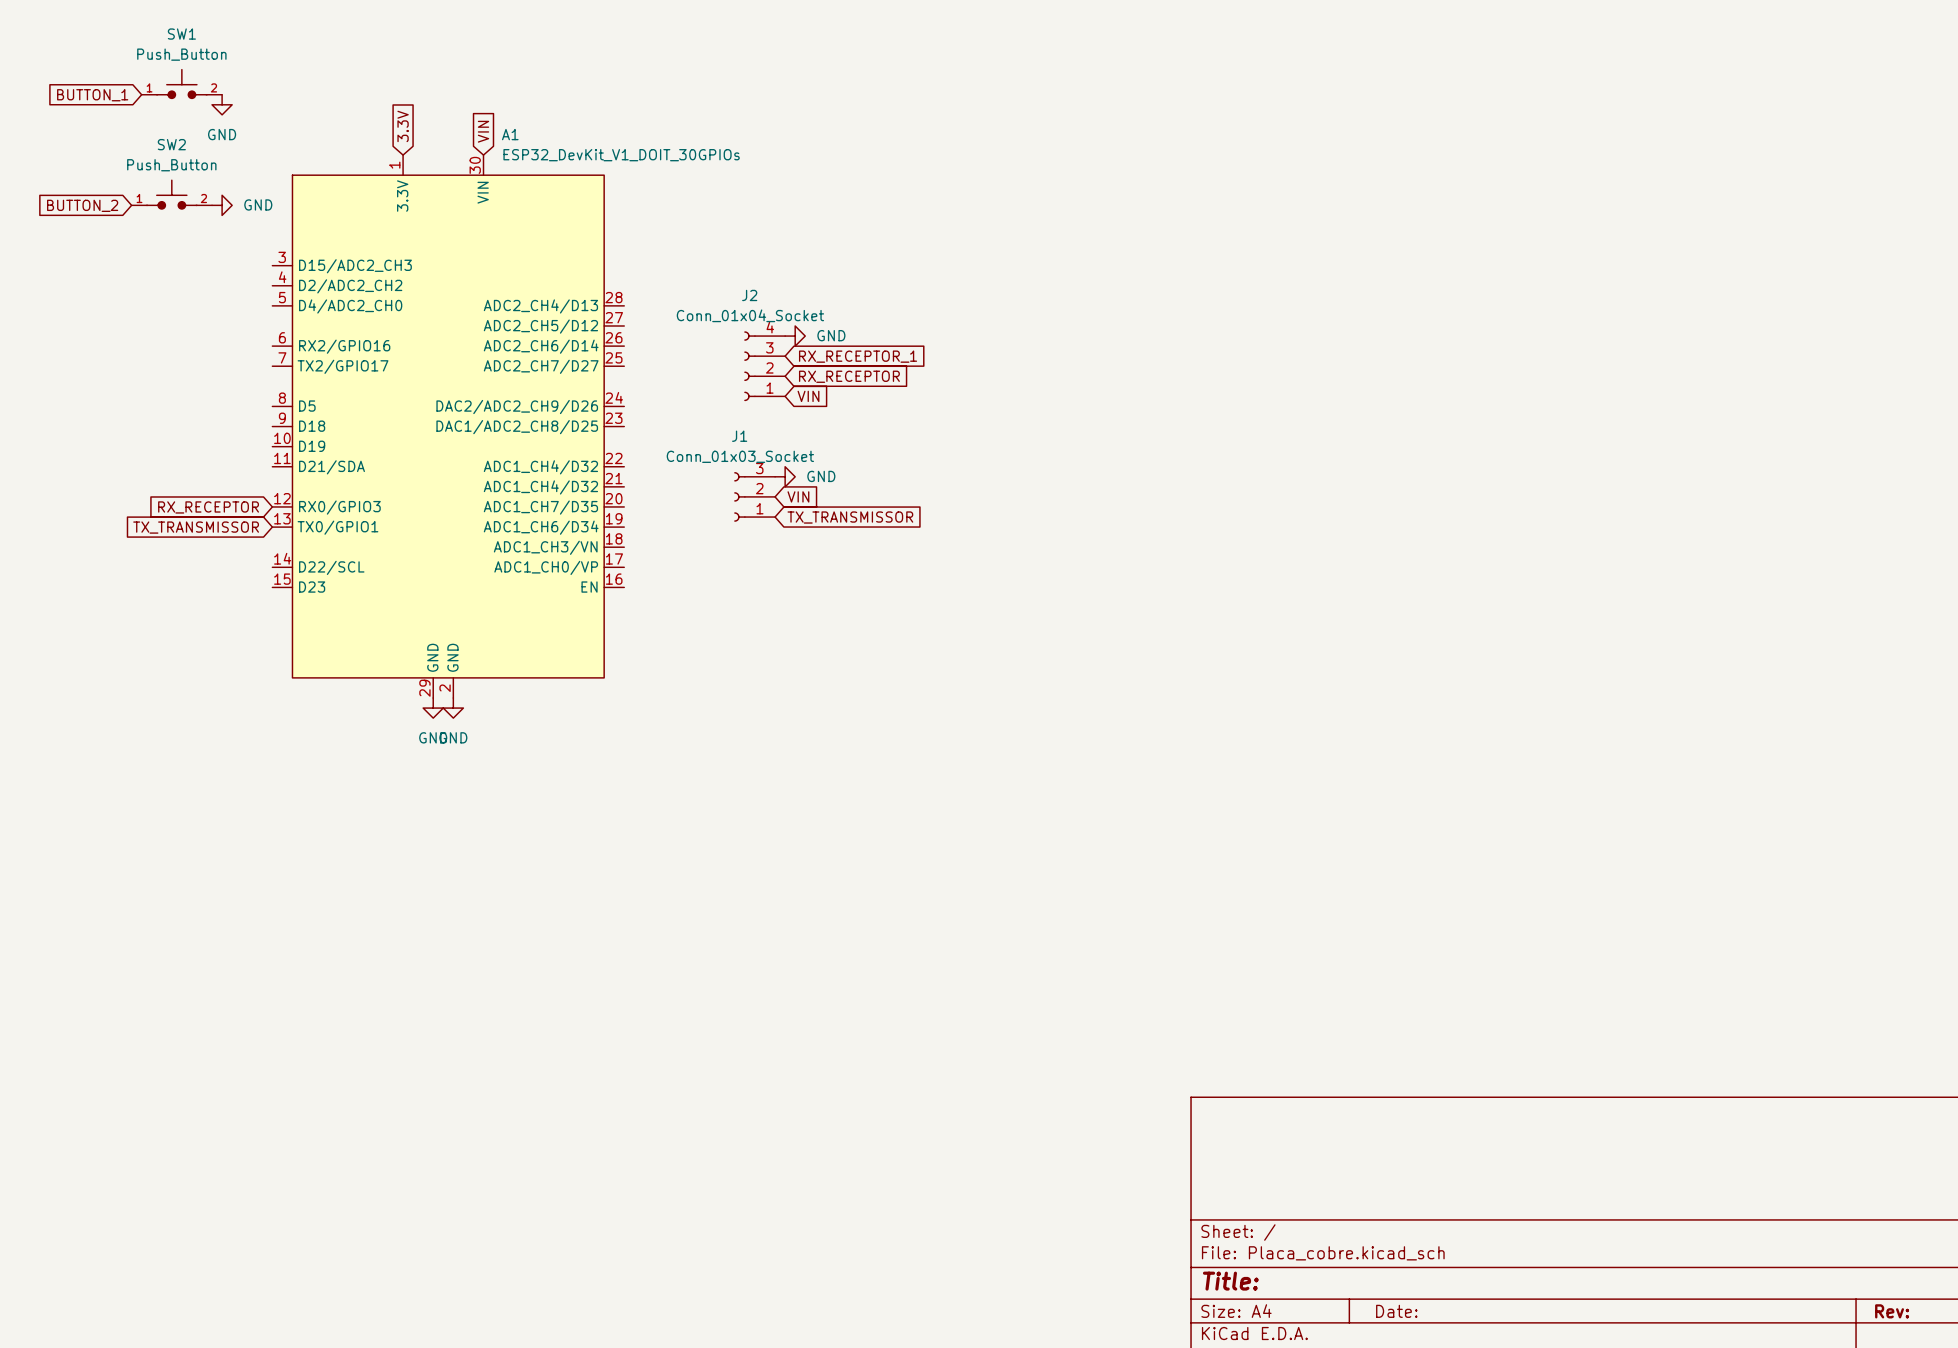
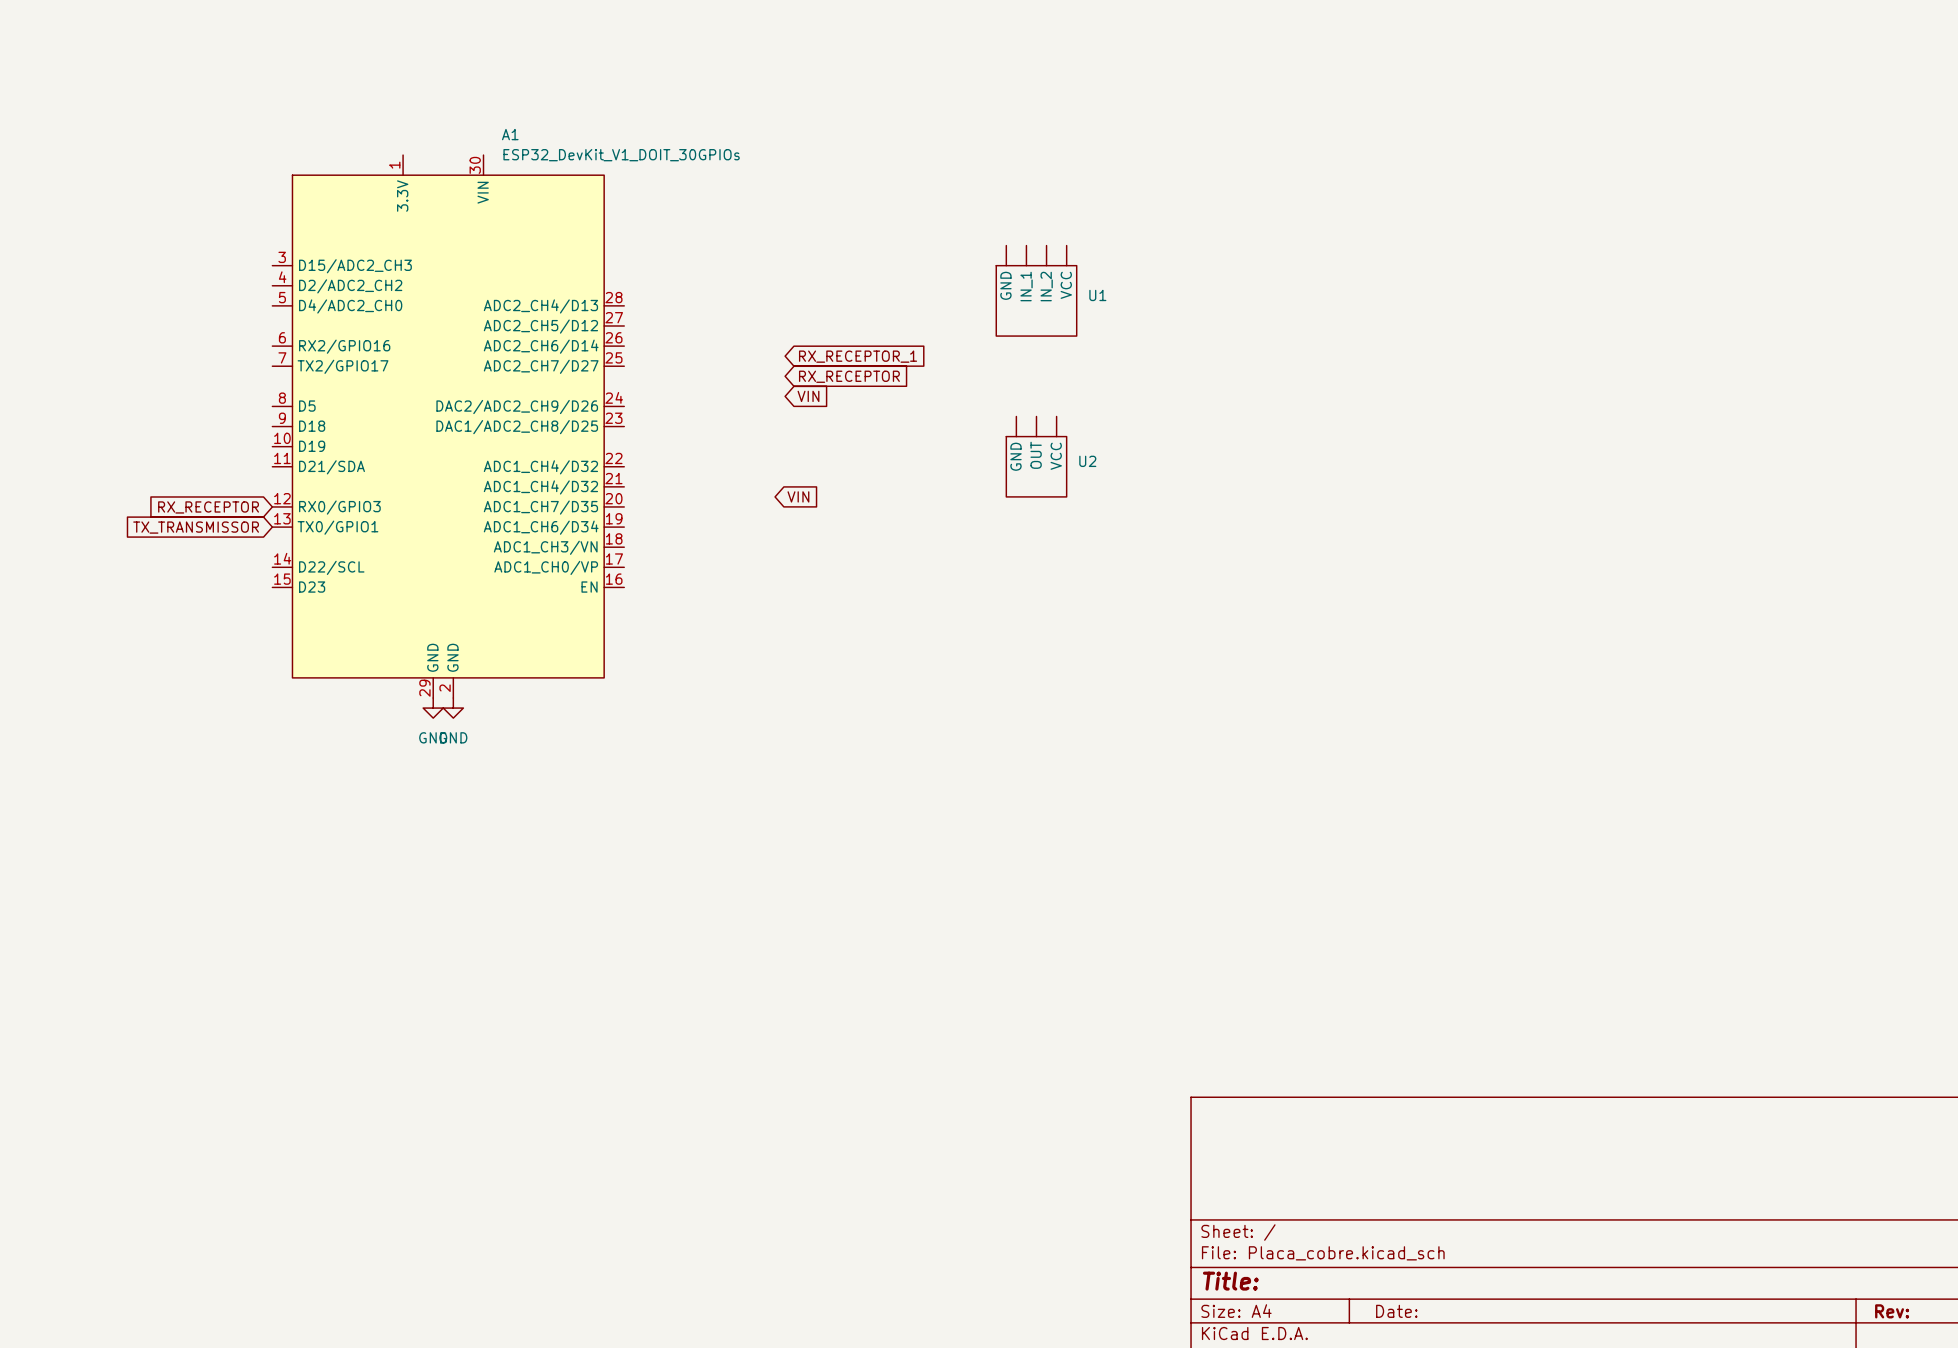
SW1: Push_Button (181, 83) -> none
global label: BUTTON_1 (92, 95) -> none
power symbol: GND (222, 104) -> none
global label: 3.3V (403, 126) -> none
global label: VIN (483, 131) -> none
SW2: Push_Button (171, 194) -> none
global label: BUTTON_2 (82, 205) -> none
power symbol: GND (222, 205) -> none
U1: none -> (1036, 290)
power symbol: GND (795, 336) -> none
J2: Conn_01x04_Socket (764, 366) -> none
U2: none -> (1036, 456)
power symbol: GND (785, 476) -> none
J1: Conn_01x03_Socket (754, 496) -> none
global label: TX_TRANSMISSOR (850, 517) -> none

